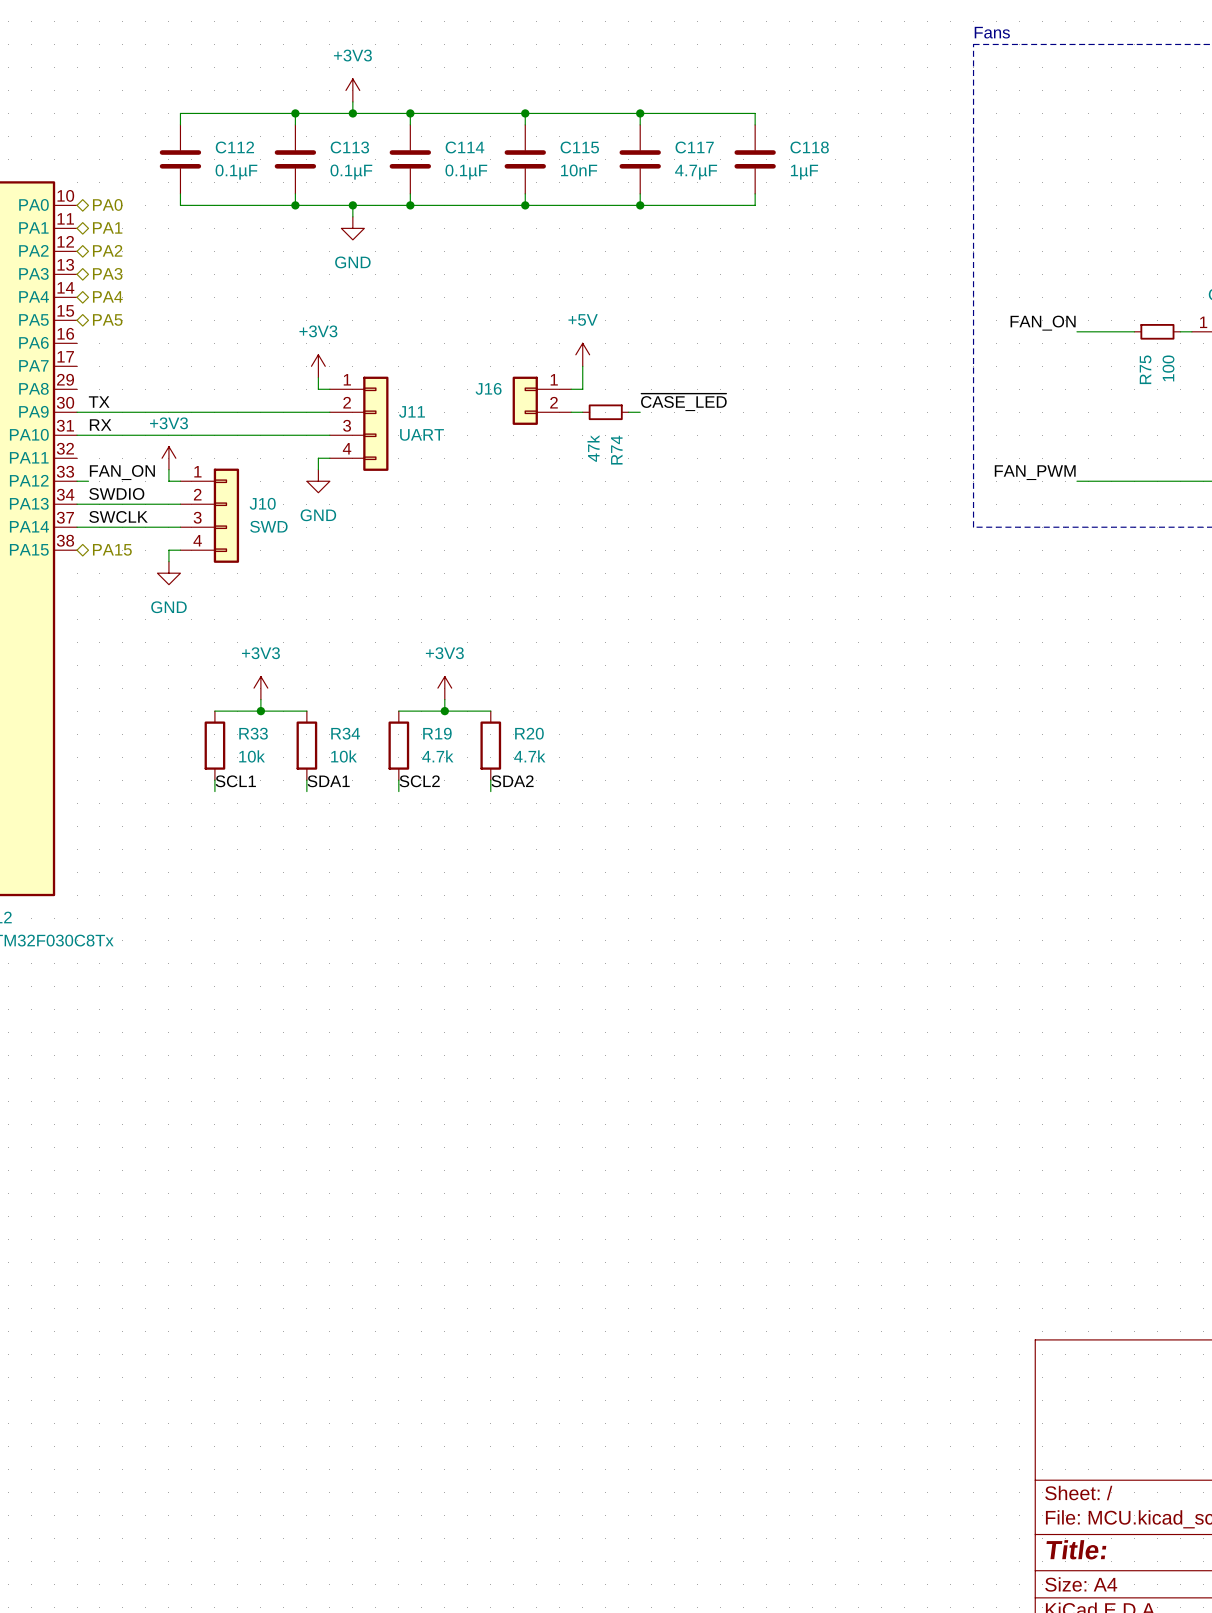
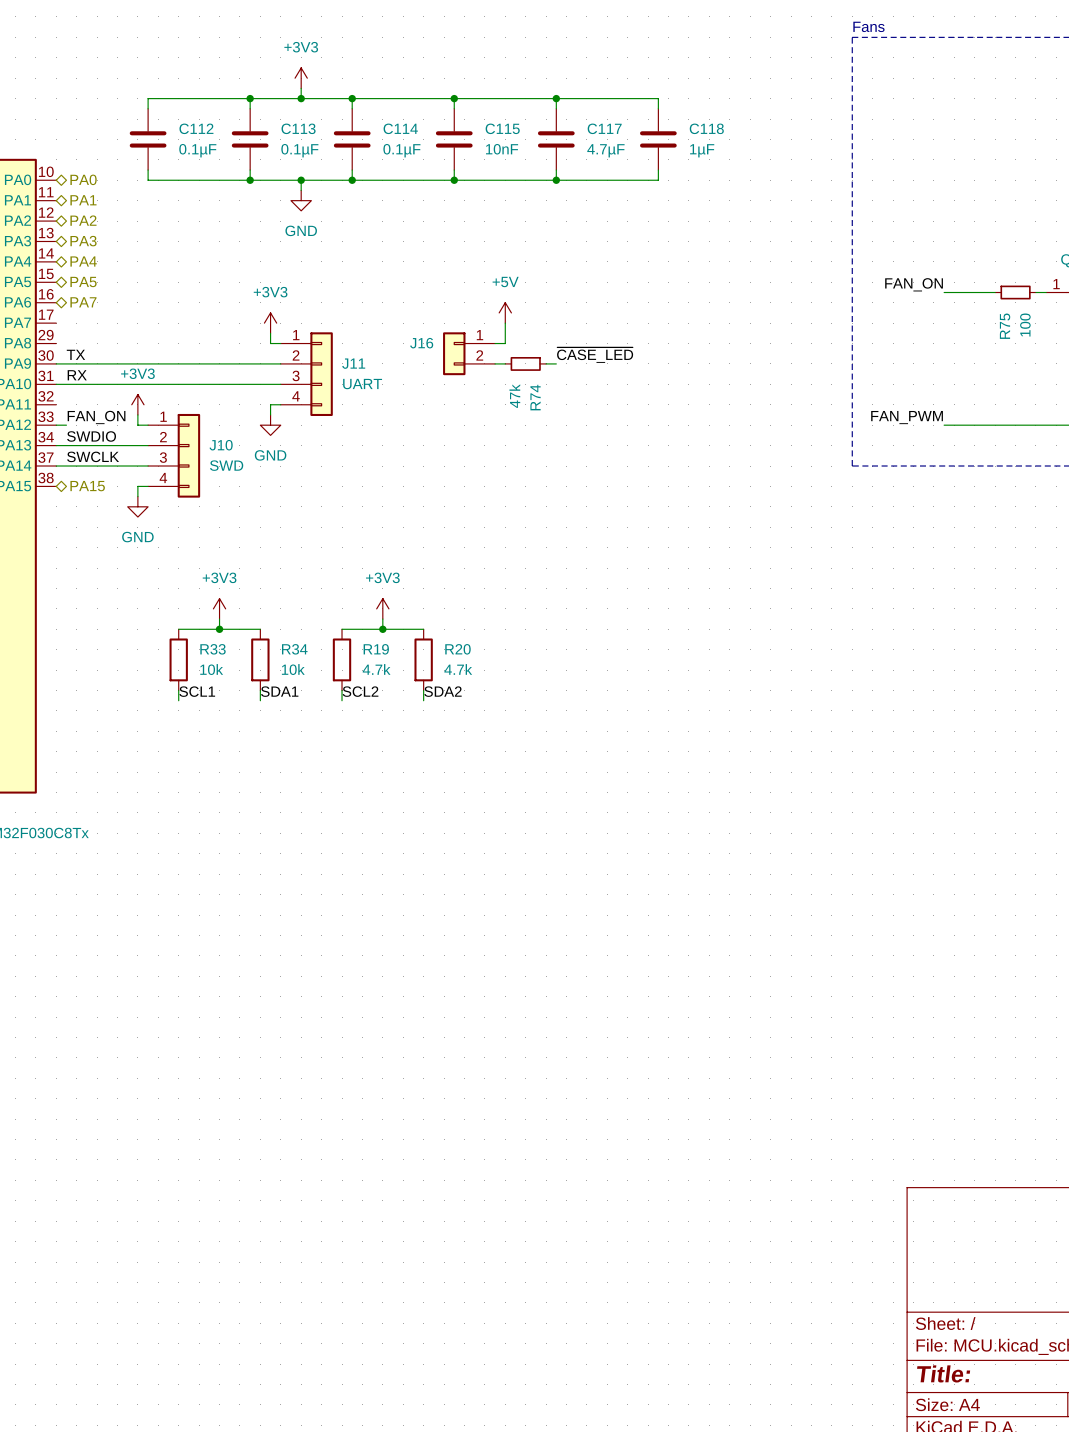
hierarchical label: none -> PA7 (83, 302)

